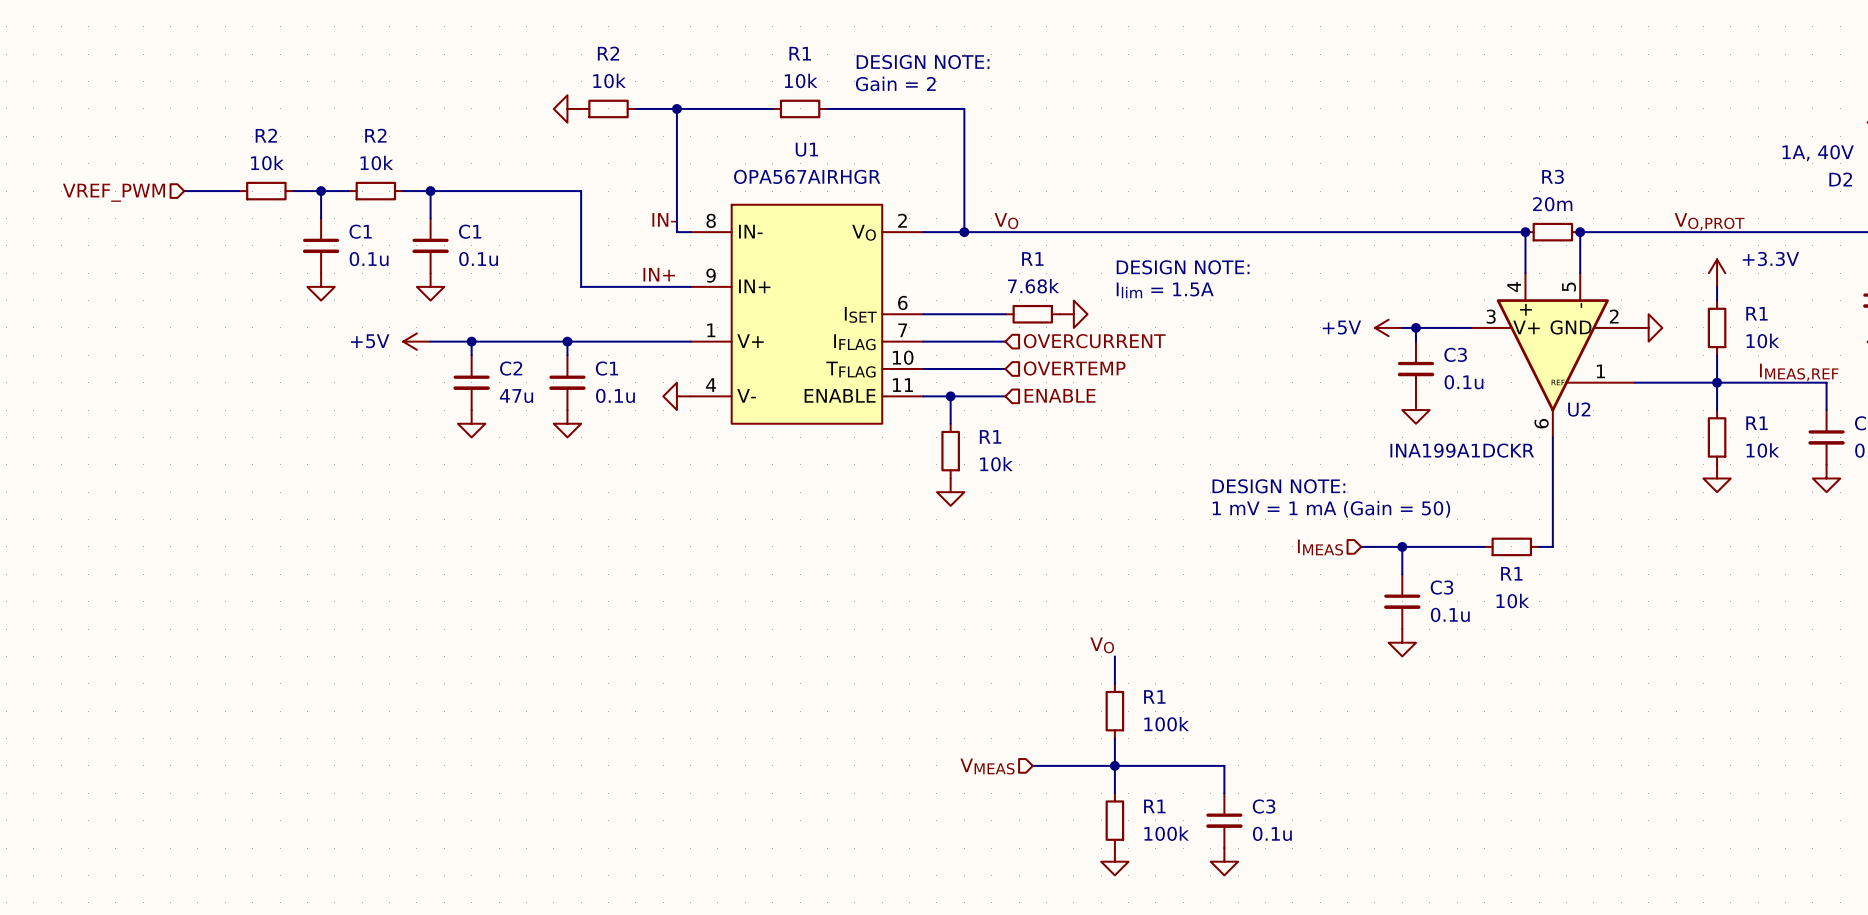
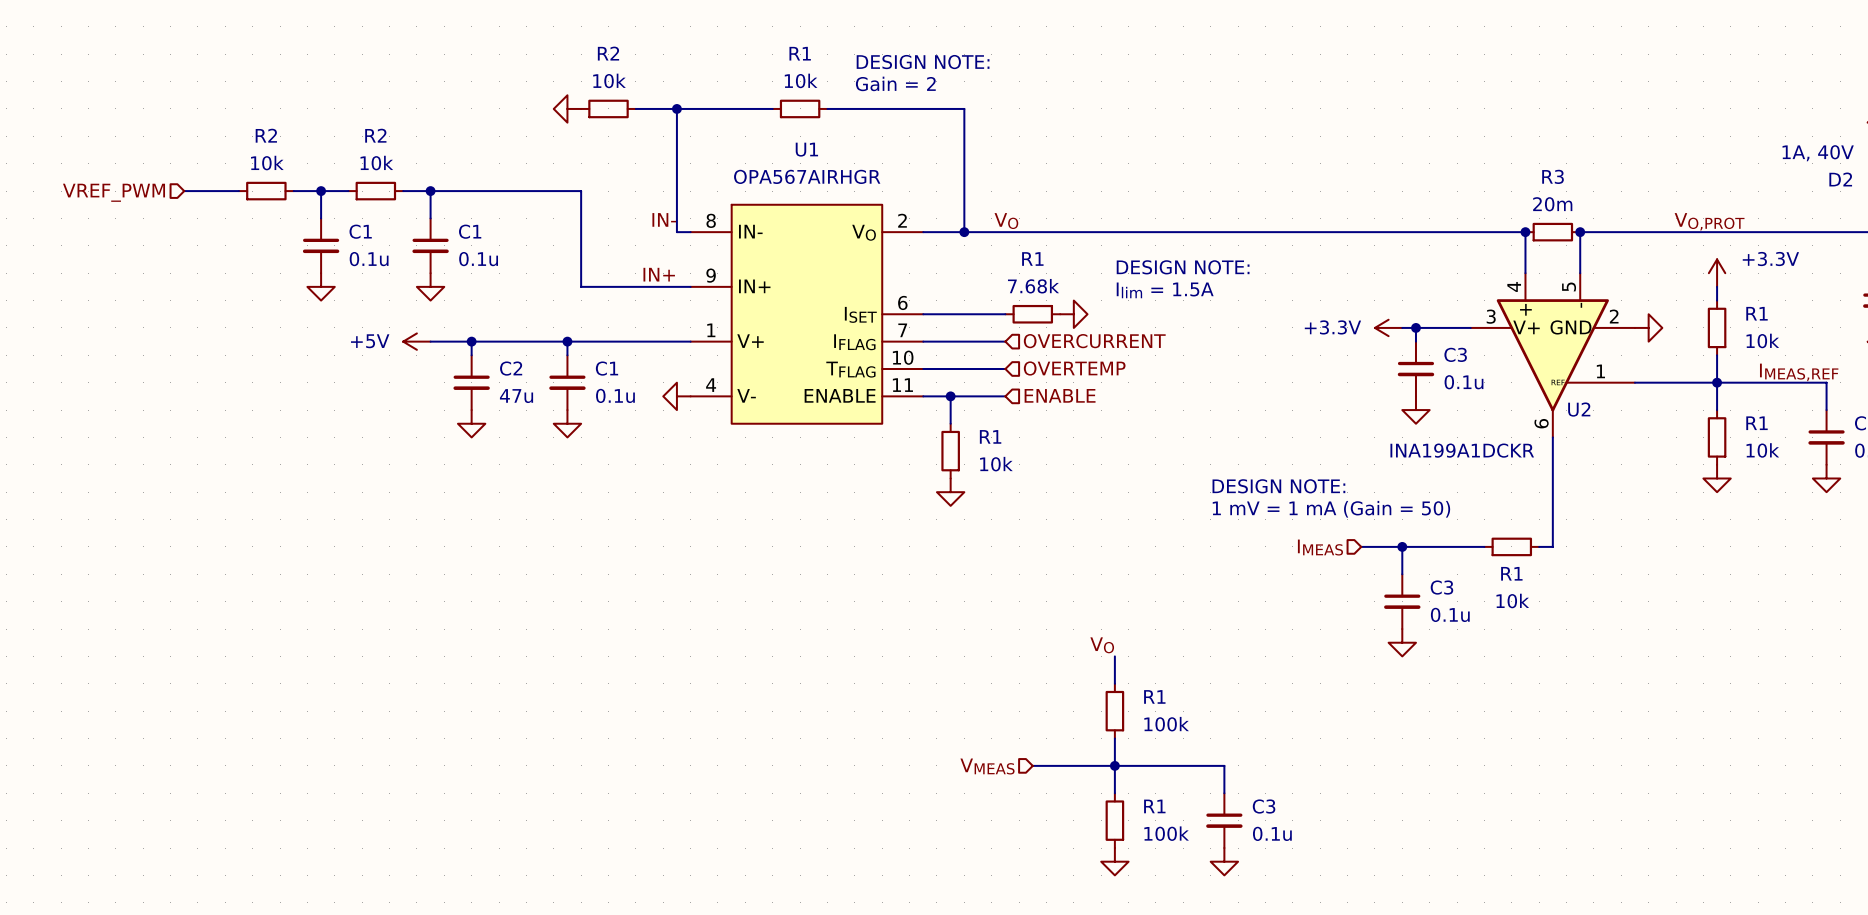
power symbol: +5V (1388, 327) -> +3.3V (1388, 327)

